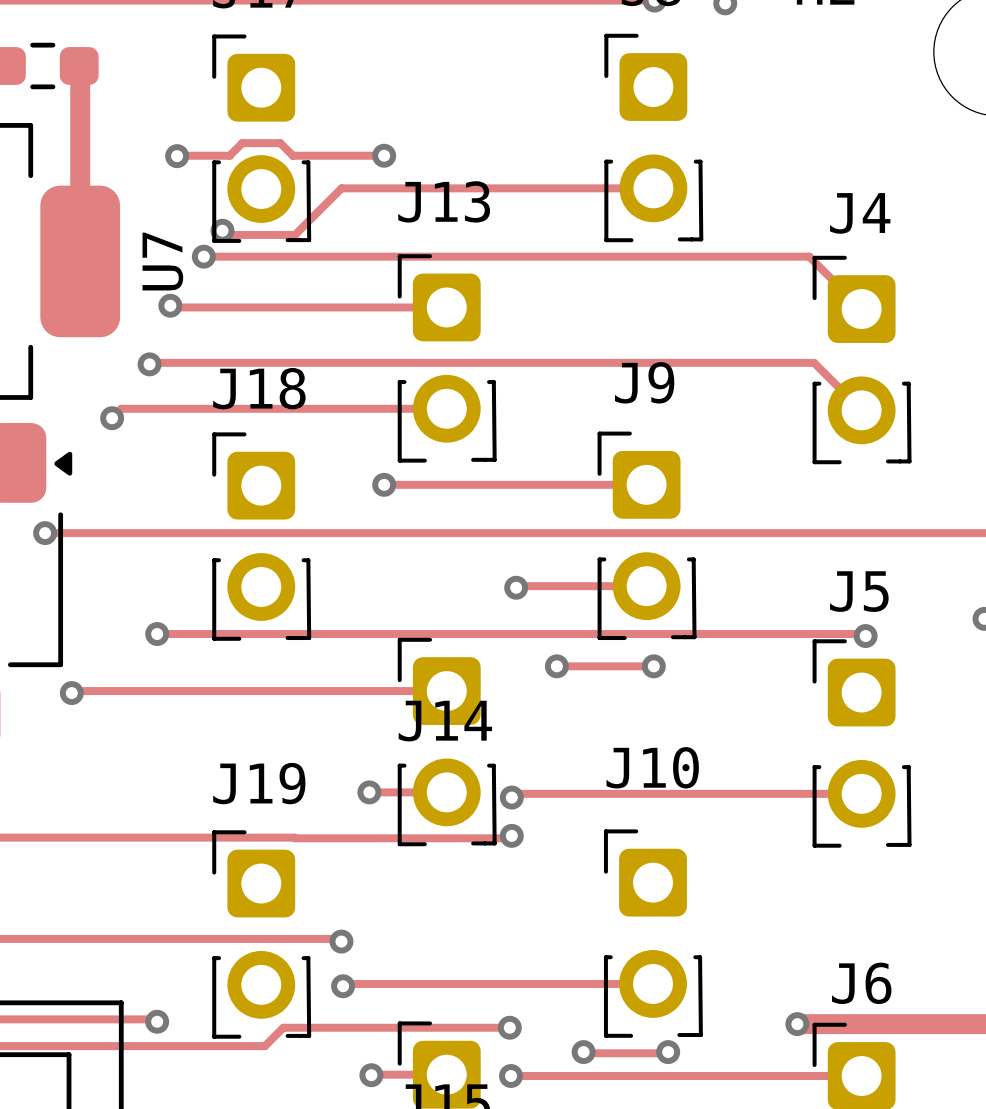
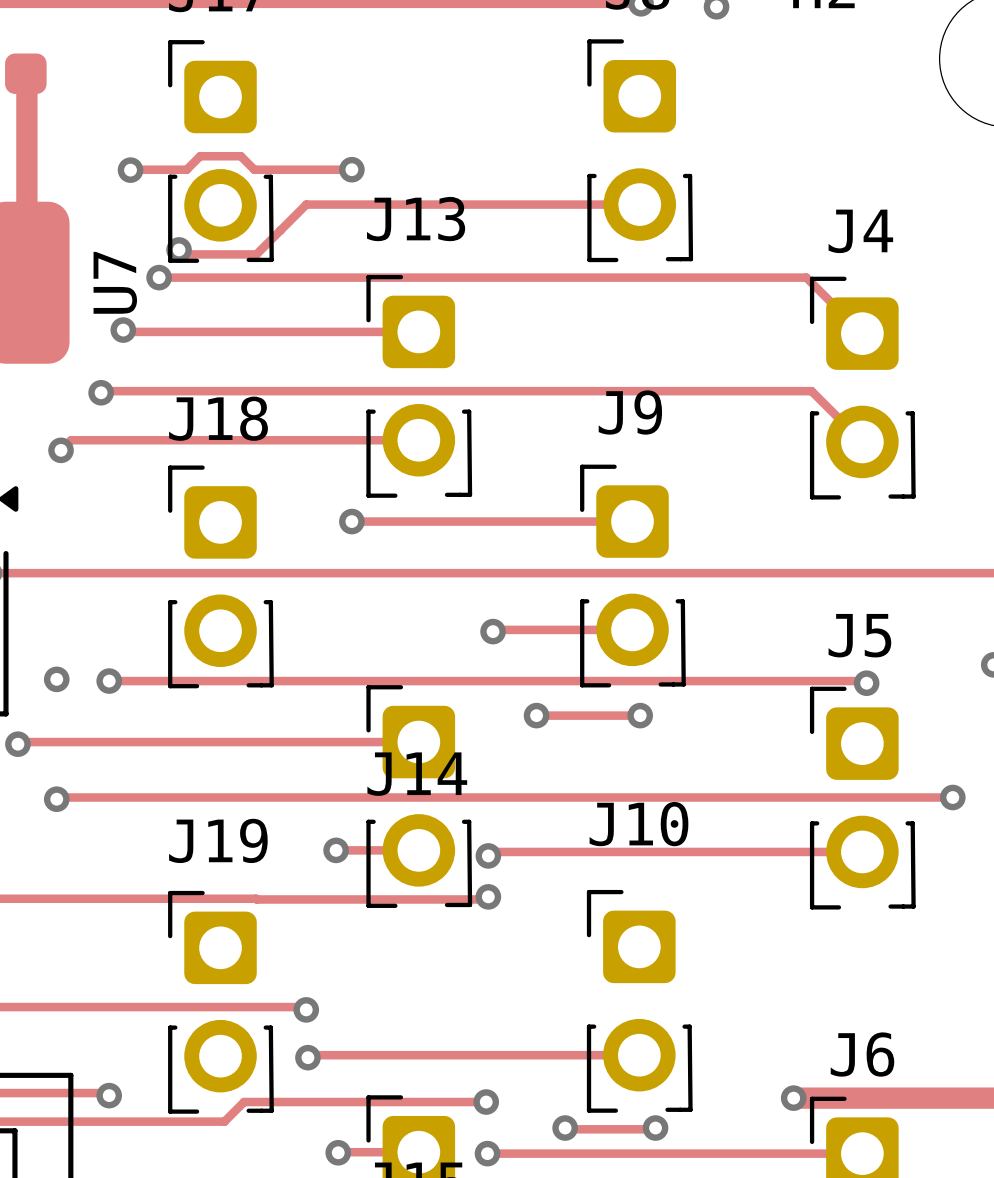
via: none -> (56, 679)
track: none -> (952, 797) (58, 797) (56, 799)
via: none -> (952, 797)
via: none -> (56, 799)

